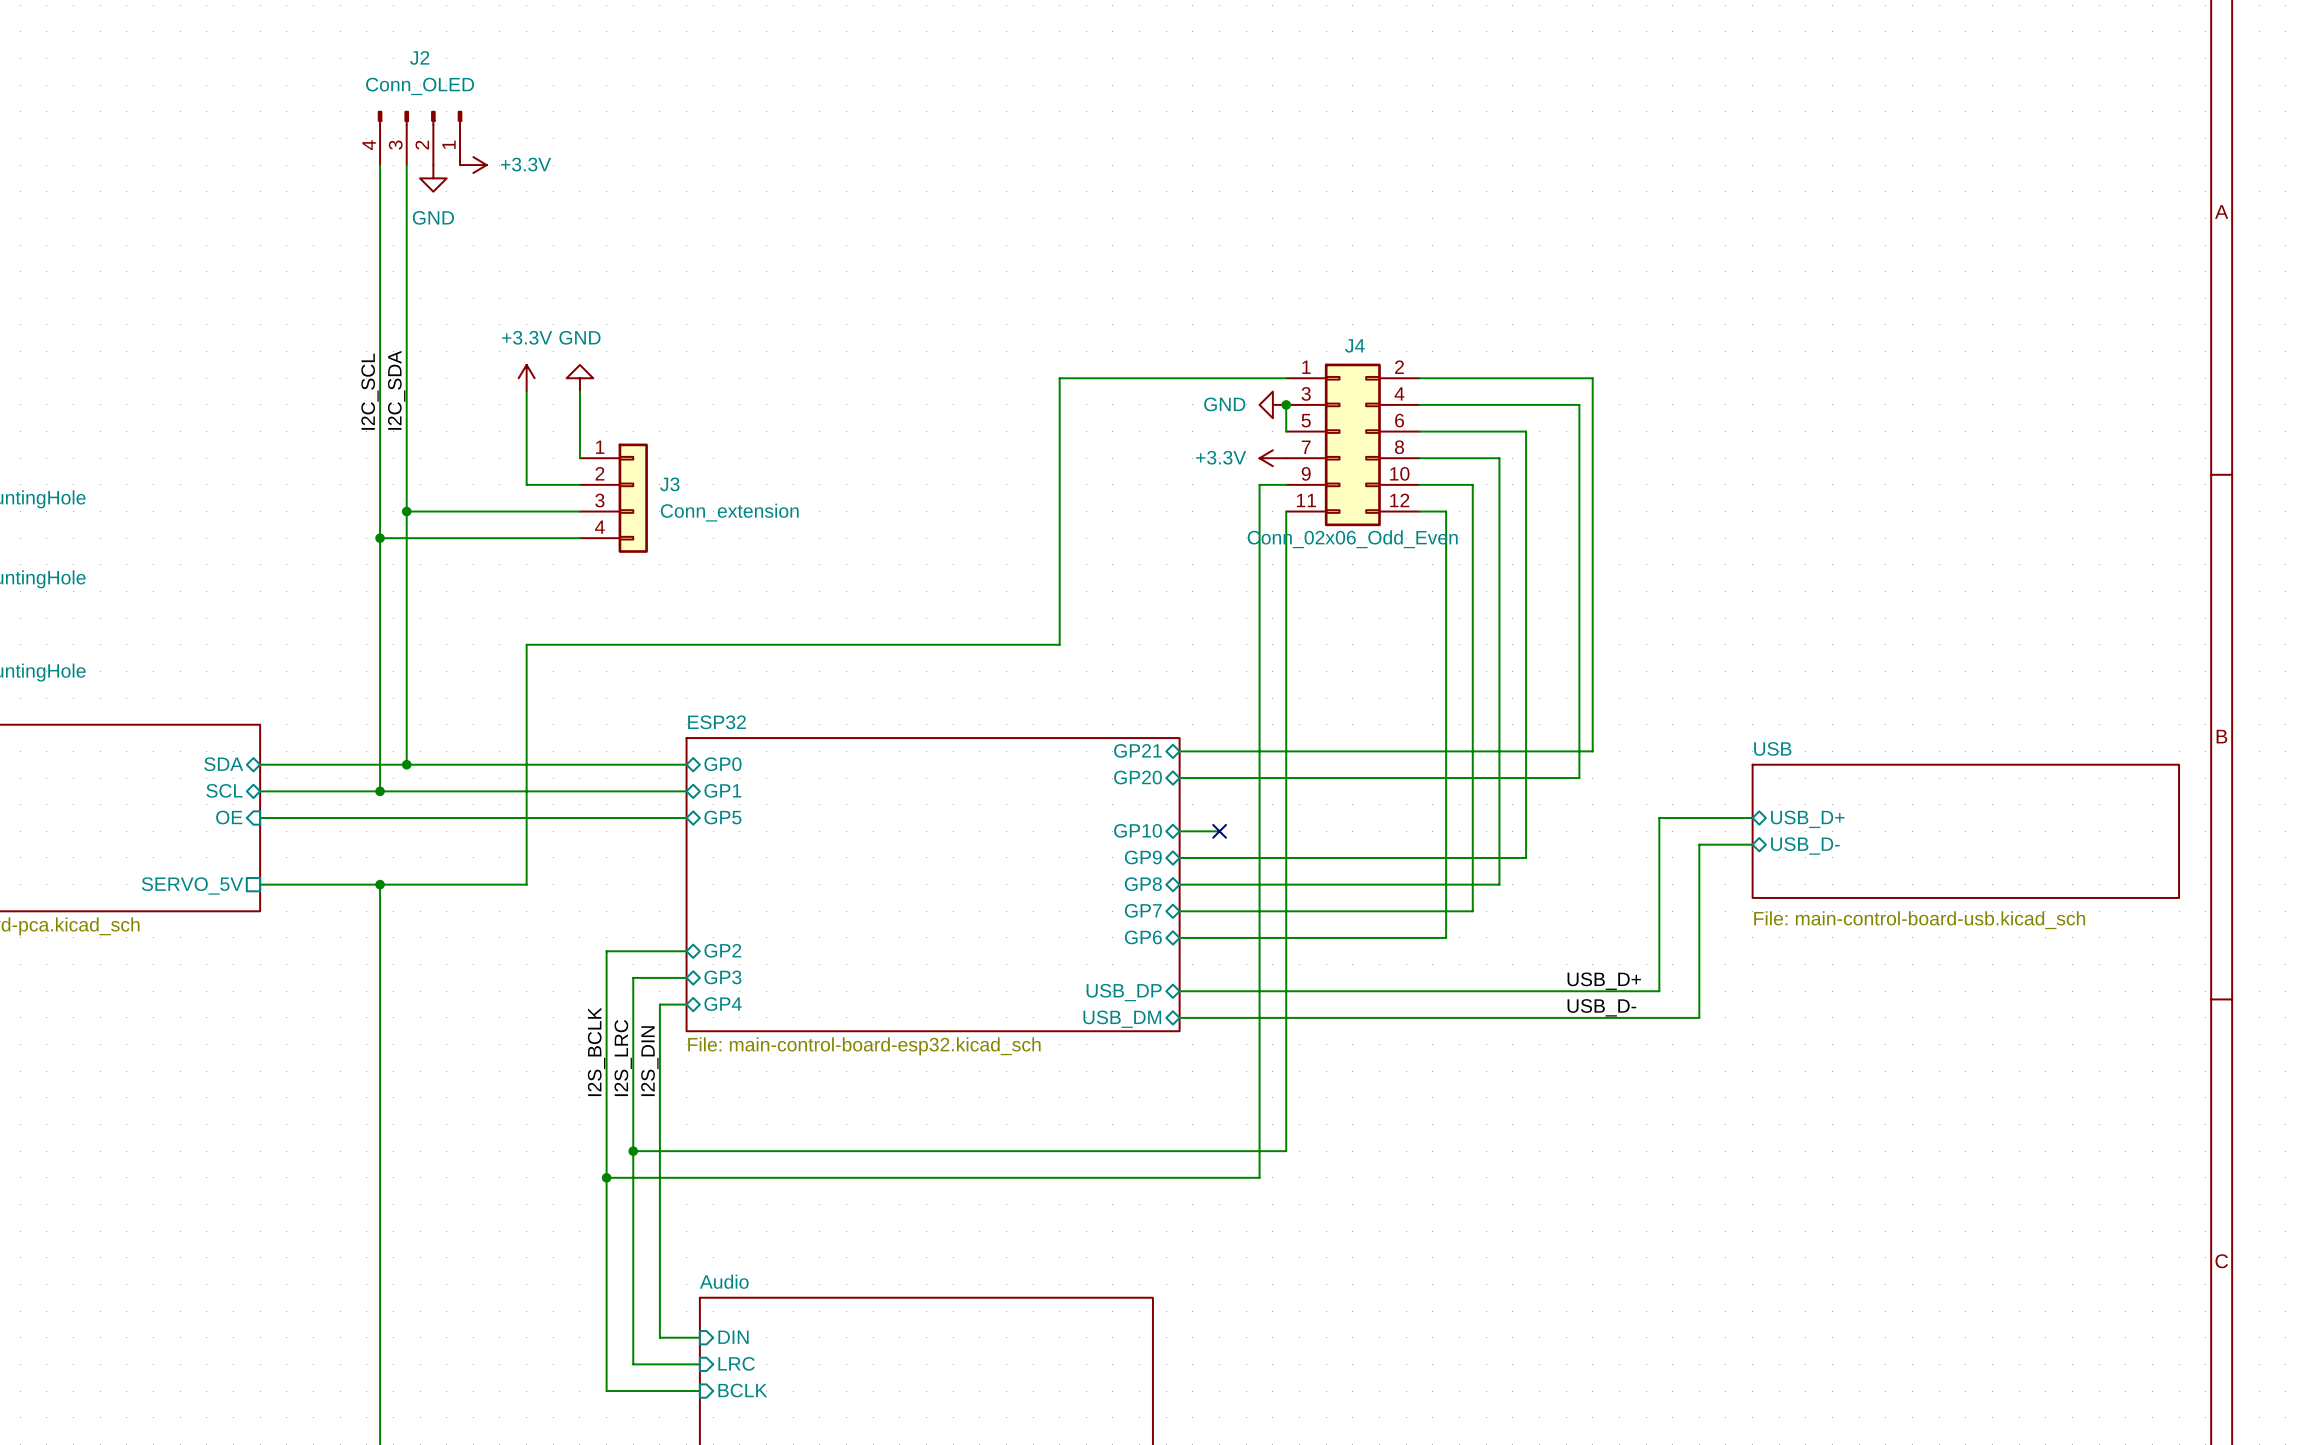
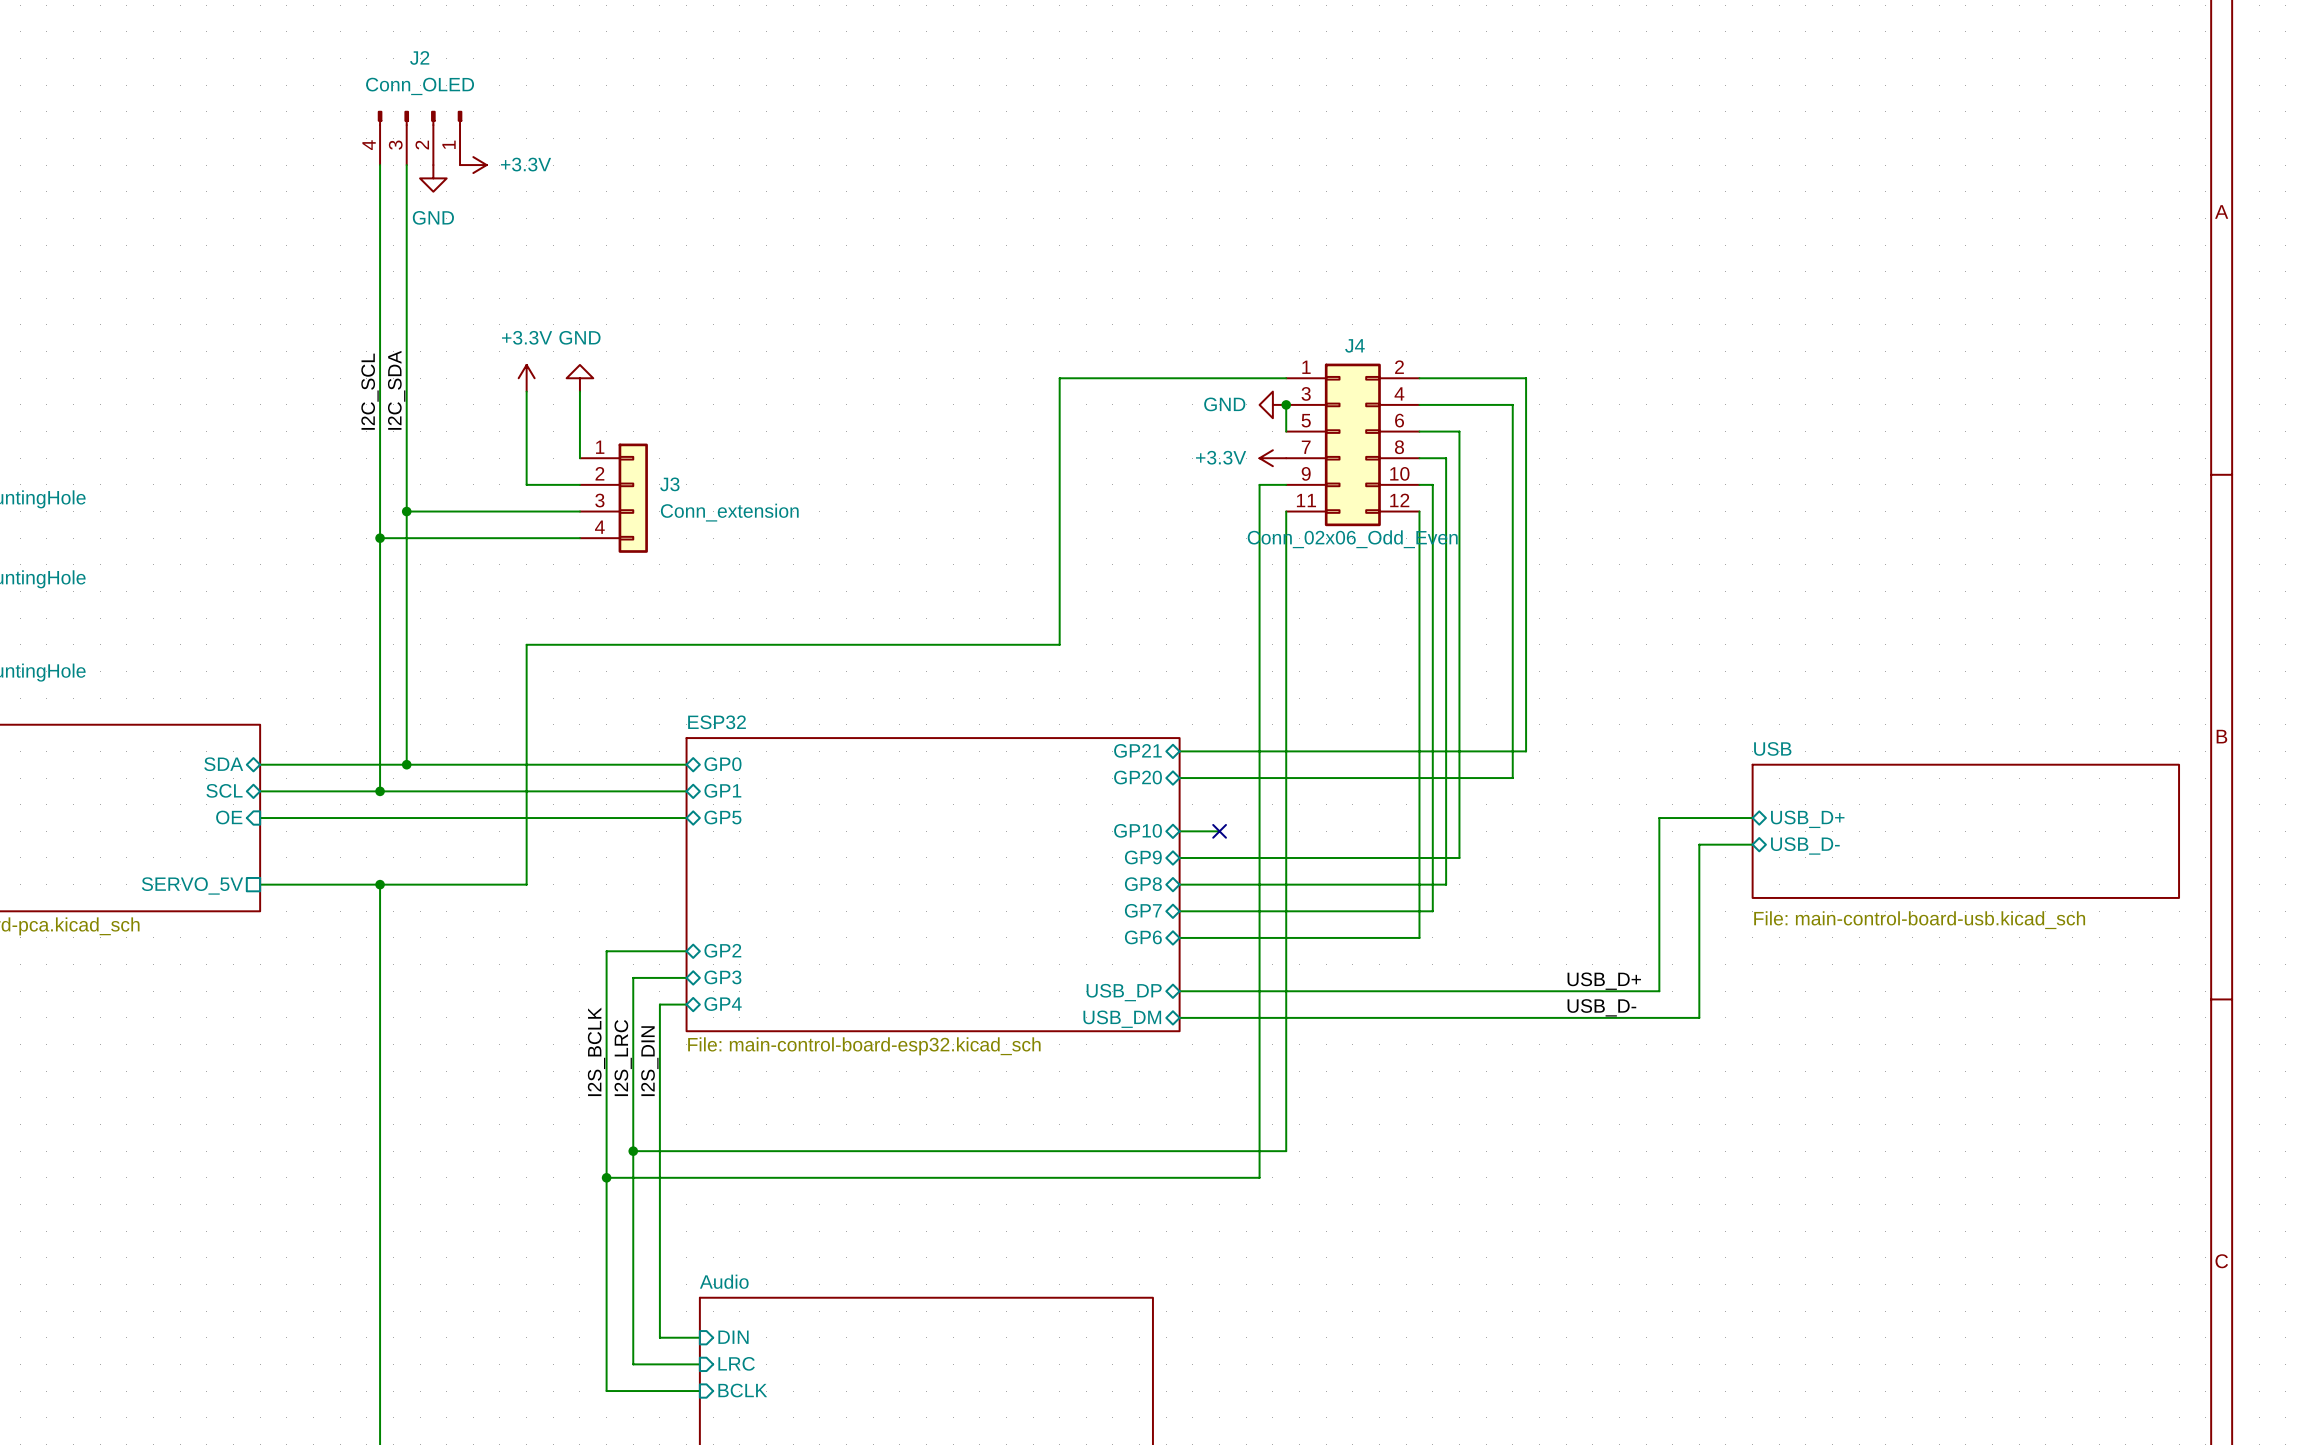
wire: (1526, 378) (1592, 378) (1592, 751) (1526, 751) (1526, 857) (1459, 857) -> (1459, 431) (1459, 857)
wire: (1512, 404) (1579, 404) (1579, 778) (1512, 778) -> (1512, 404) (1512, 778)
wire: (1459, 431) (1526, 431) -> (1526, 378) (1526, 431)
wire: (1446, 458) (1499, 458) (1499, 884) (1446, 884) (1446, 937) (1419, 937) -> (1419, 511) (1419, 937)
wire: (1432, 484) (1472, 484) (1472, 911) (1432, 911) -> (1432, 484) (1432, 911)
wire: (1419, 511) (1446, 511) -> (1446, 458) (1446, 511)

